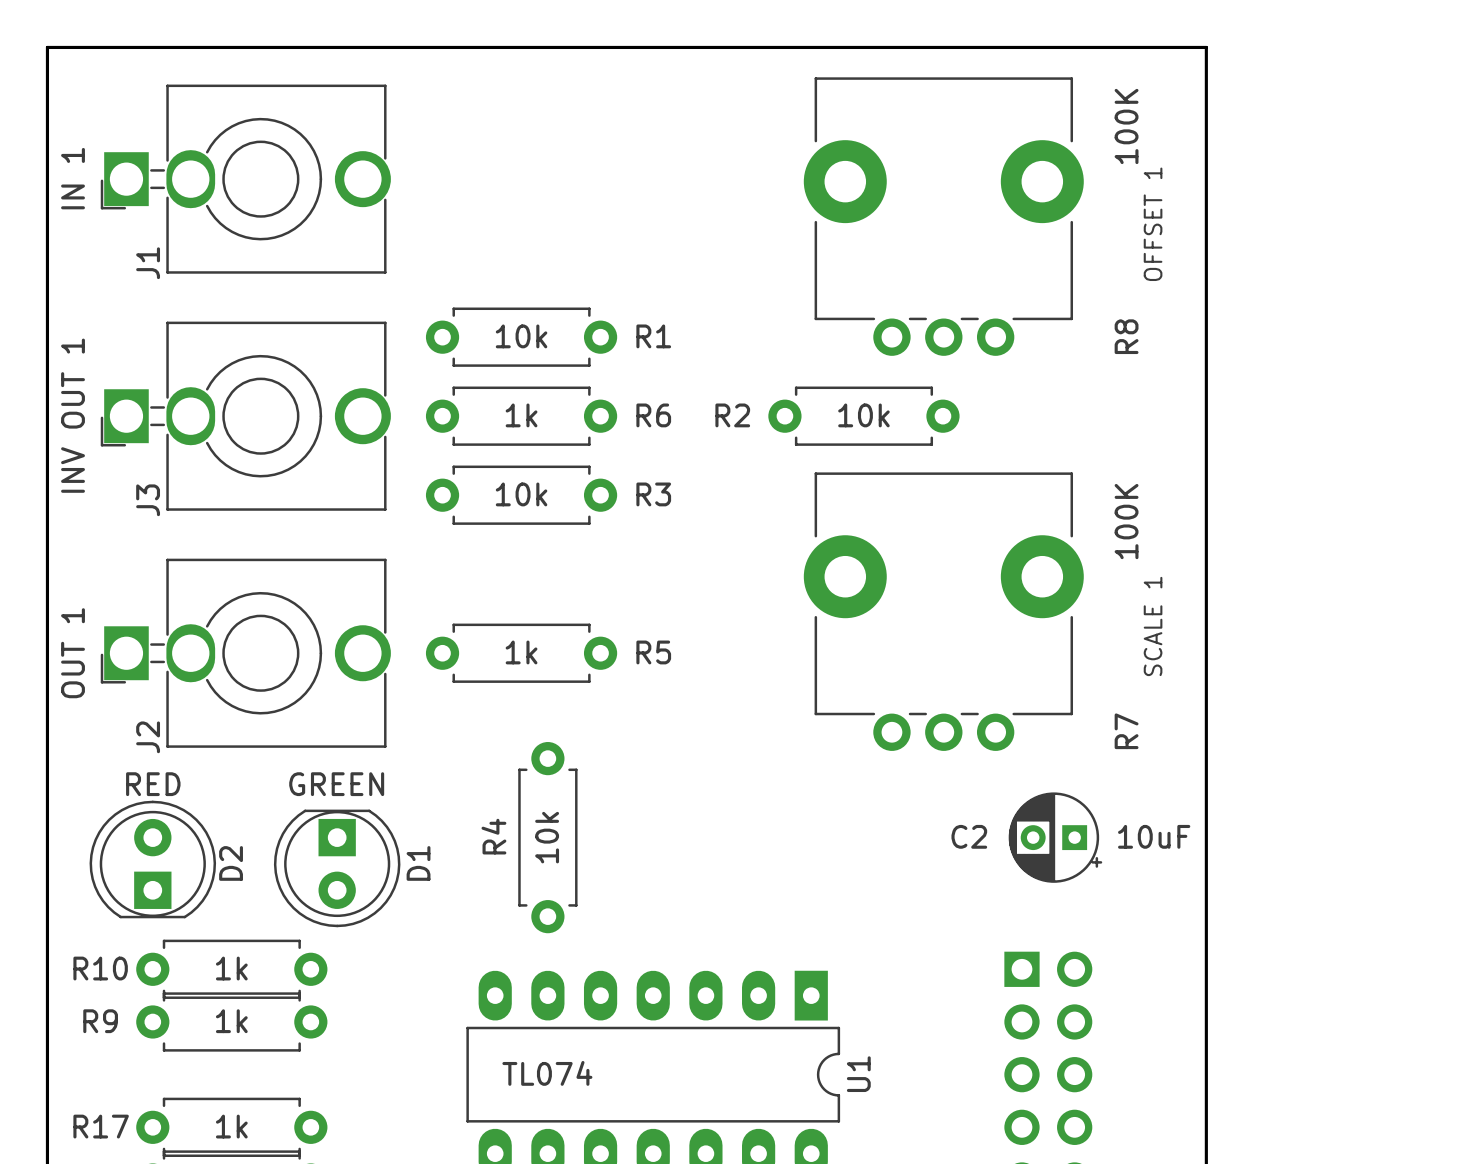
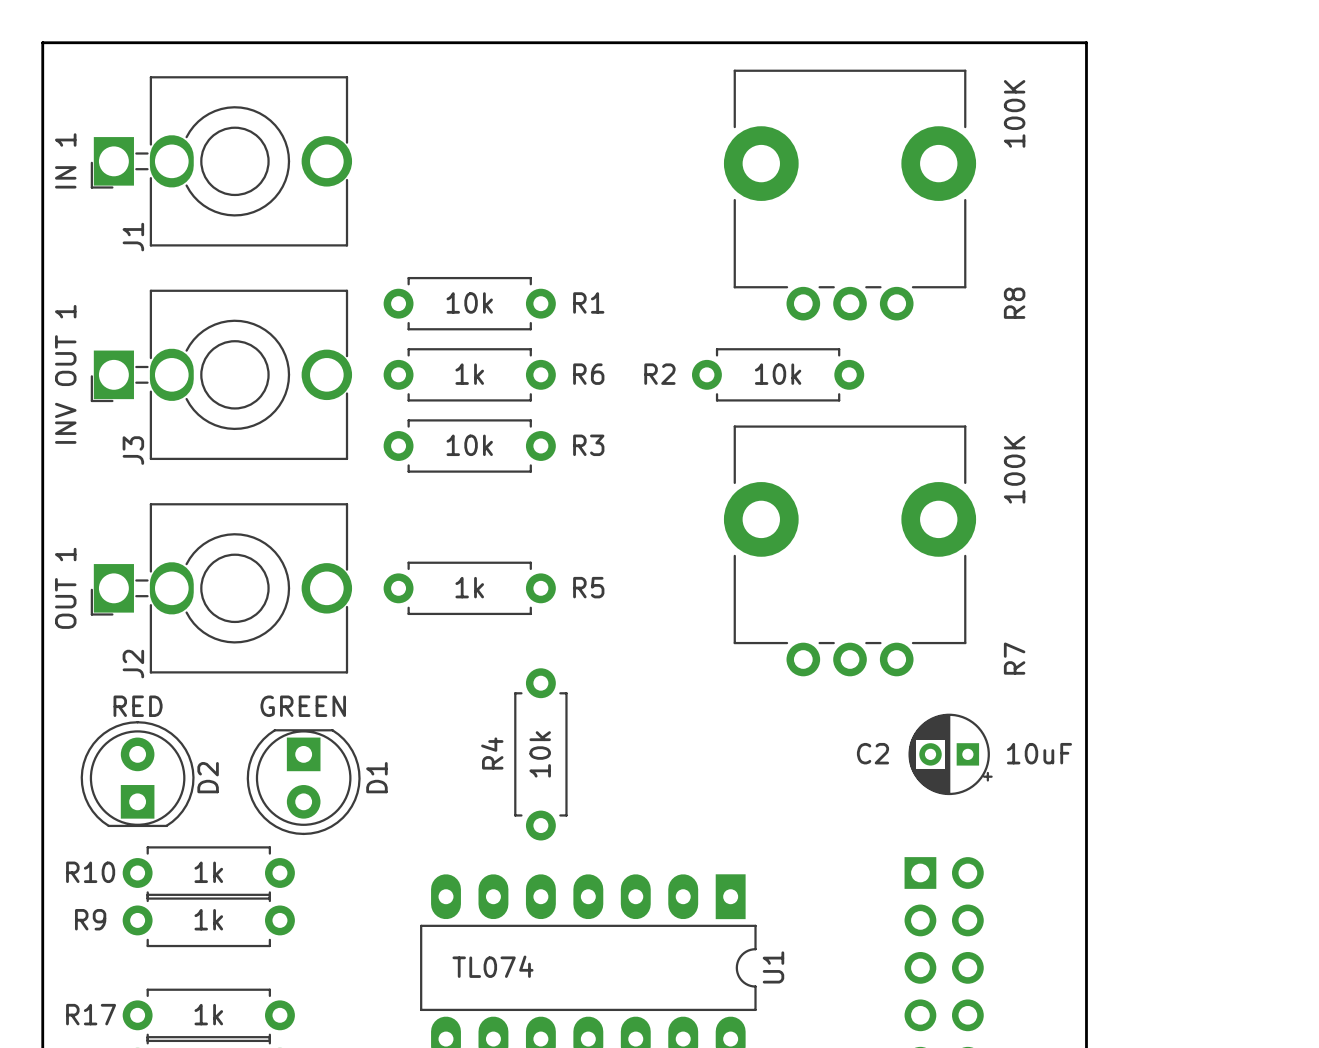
text: OFFSET 1 (1153, 224) -> none
text: SCALE 1 (1153, 626) -> none
R4 position: (547, 837) -> (540, 754)

